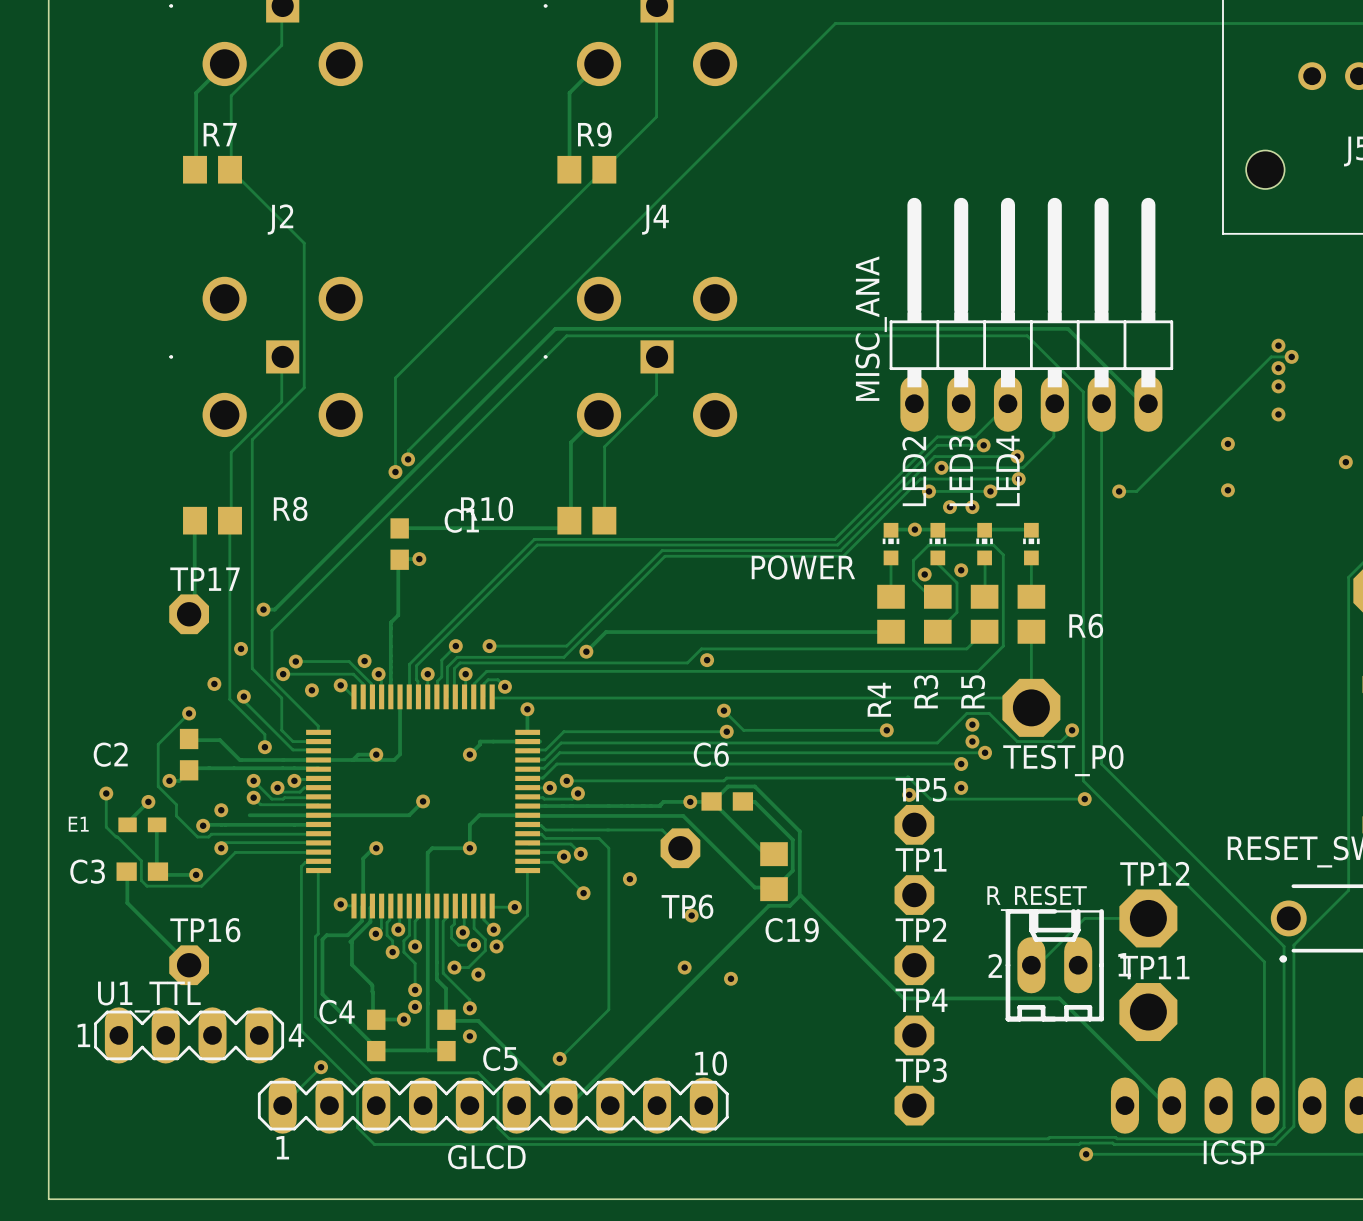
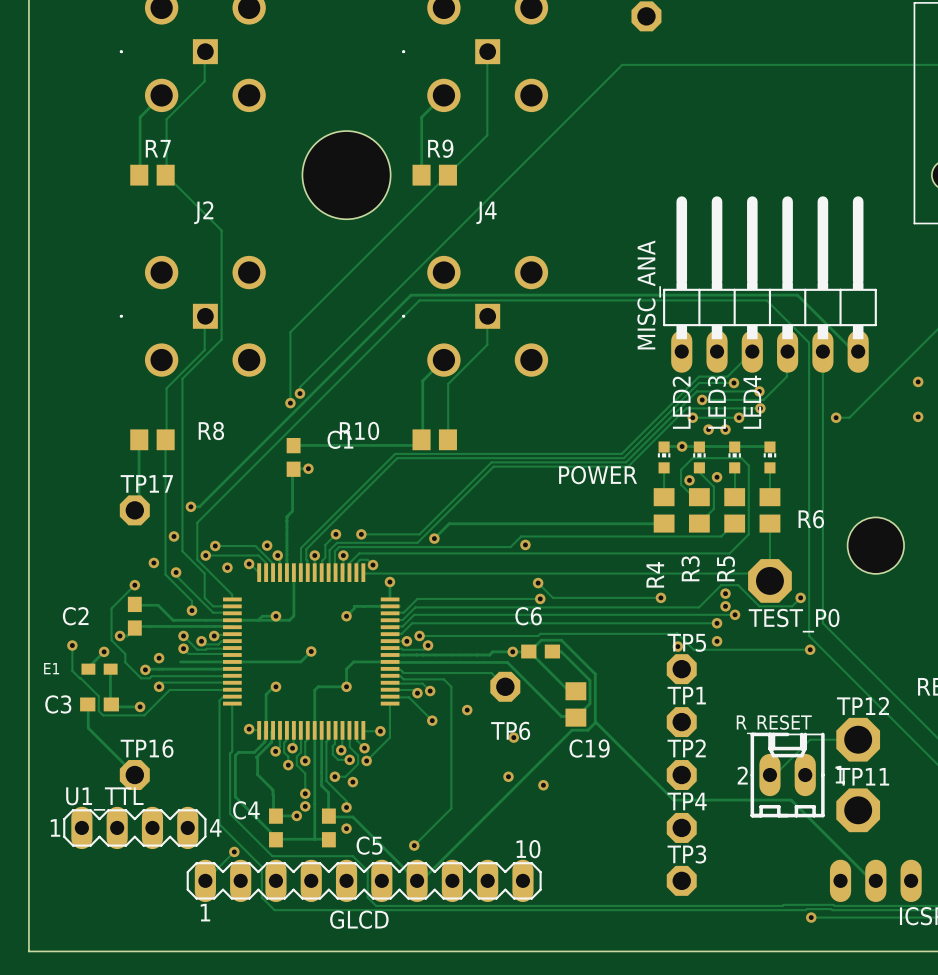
hole: none -> (346, 175)
hole: none -> (875, 545)

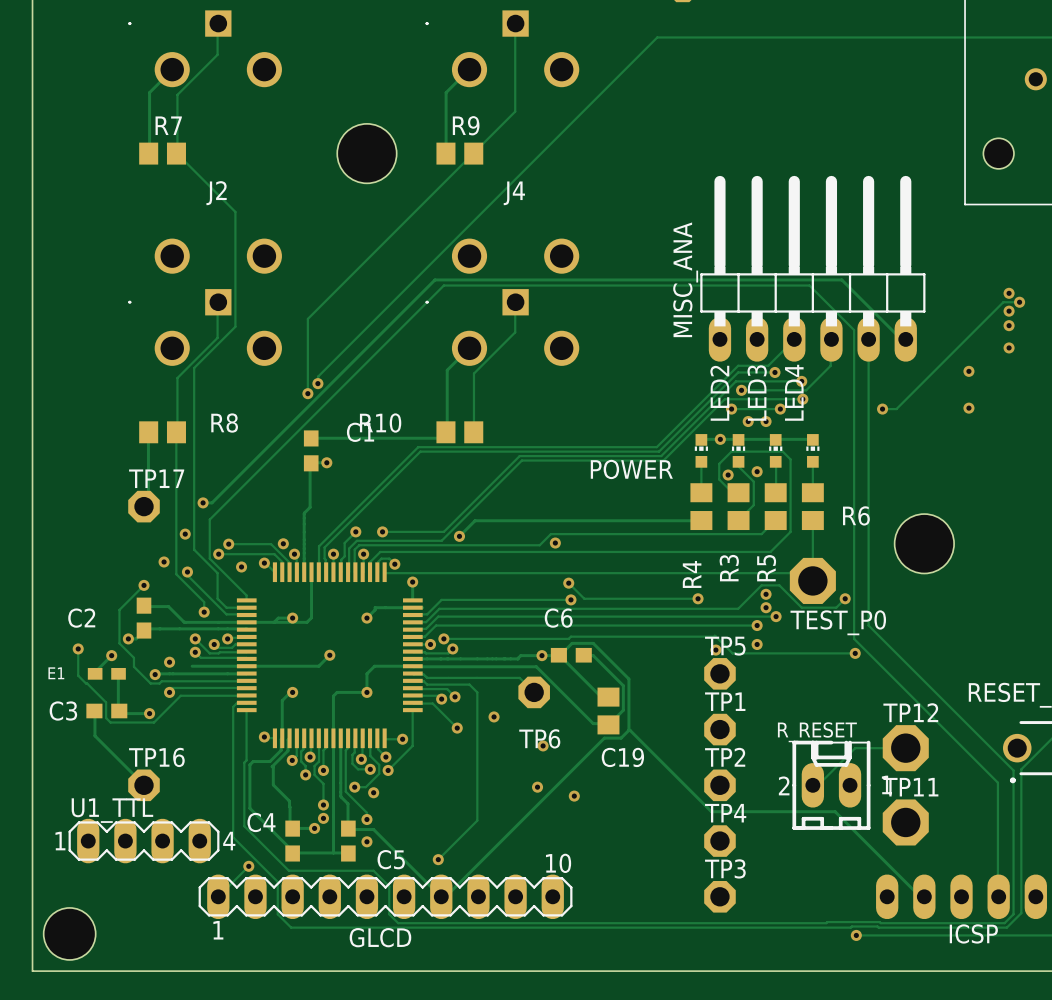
hole size: [302, 131, 391, 220] -> [337, 123, 397, 184]
hole: none -> (69, 933)

